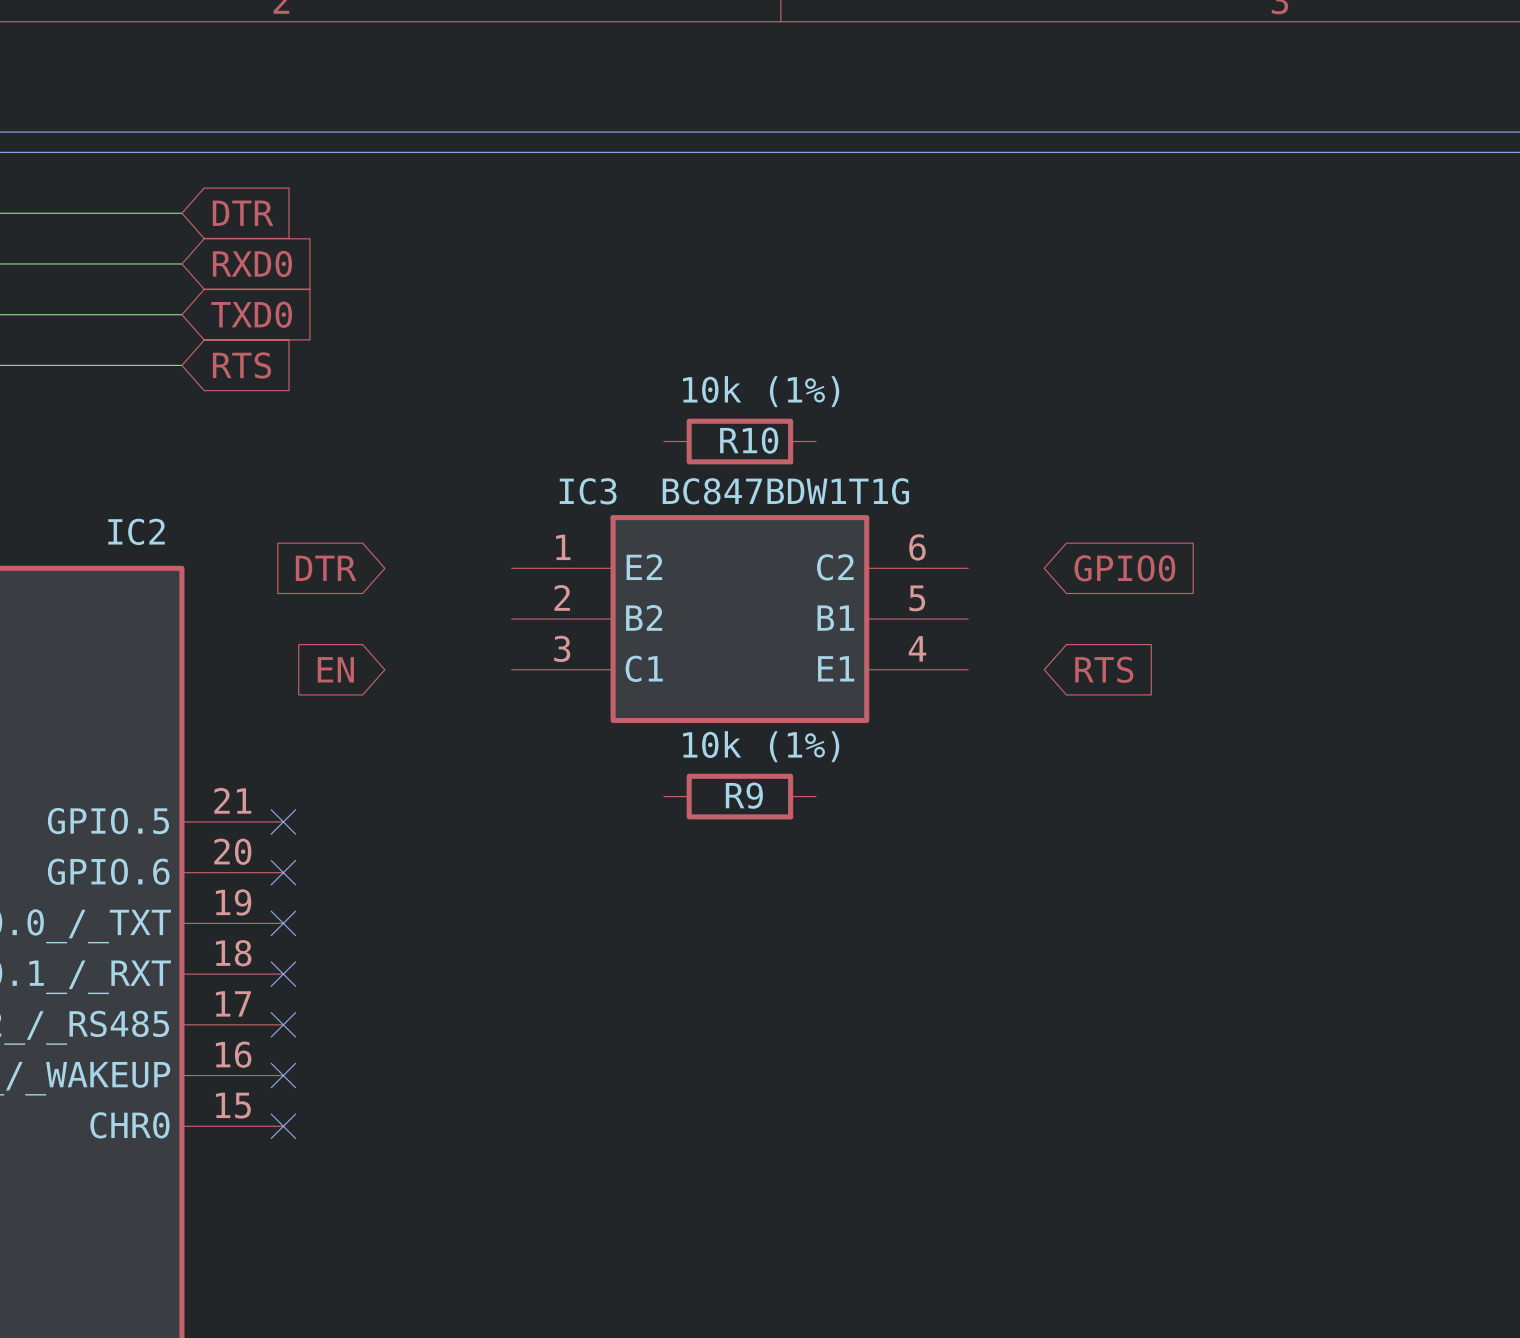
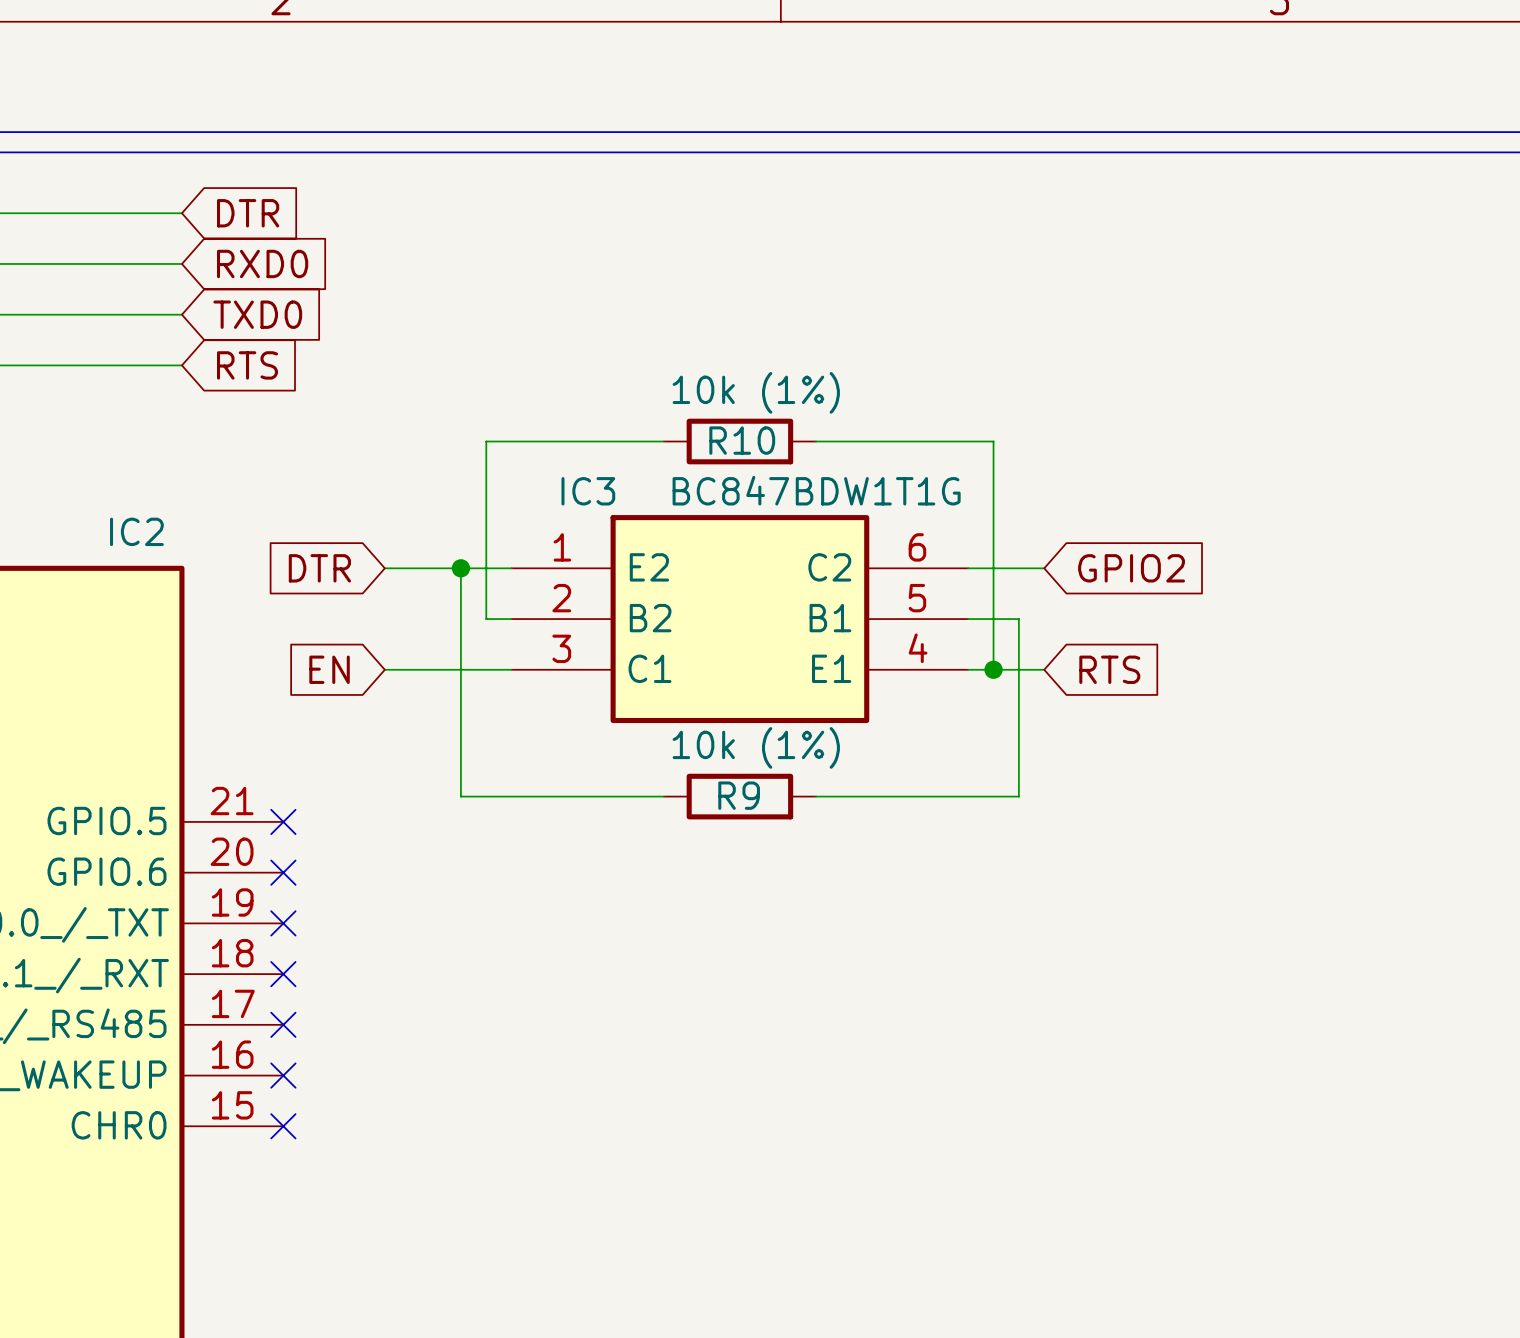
wire: none -> (663, 441) (486, 441) (486, 619) (511, 619)
wire: none -> (816, 441) (993, 441) (993, 669)
IC3 value position: BC847BDW1T1G (785, 491) -> BC847BDW1T1G (816, 490)
wire: none -> (384, 568) (511, 568)
wire: none -> (460, 568) (460, 796) (663, 796)
junction: none -> (460, 568)
wire: none -> (968, 568) (1044, 568)
global label: GPIO0 (1124, 568) -> GPIO2 (1131, 568)
wire: none -> (968, 619) (1018, 619) (1018, 796) (816, 796)
wire: none -> (384, 669) (511, 669)
wire: none -> (968, 669) (1044, 669)
junction: none -> (993, 669)

